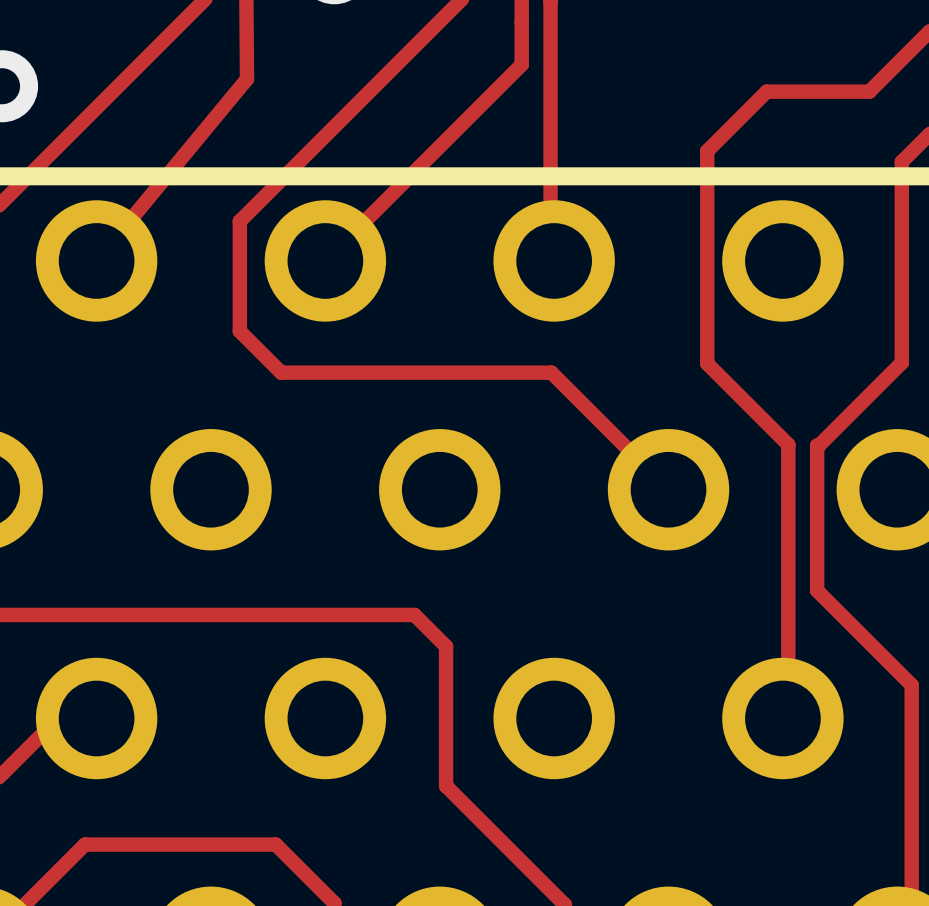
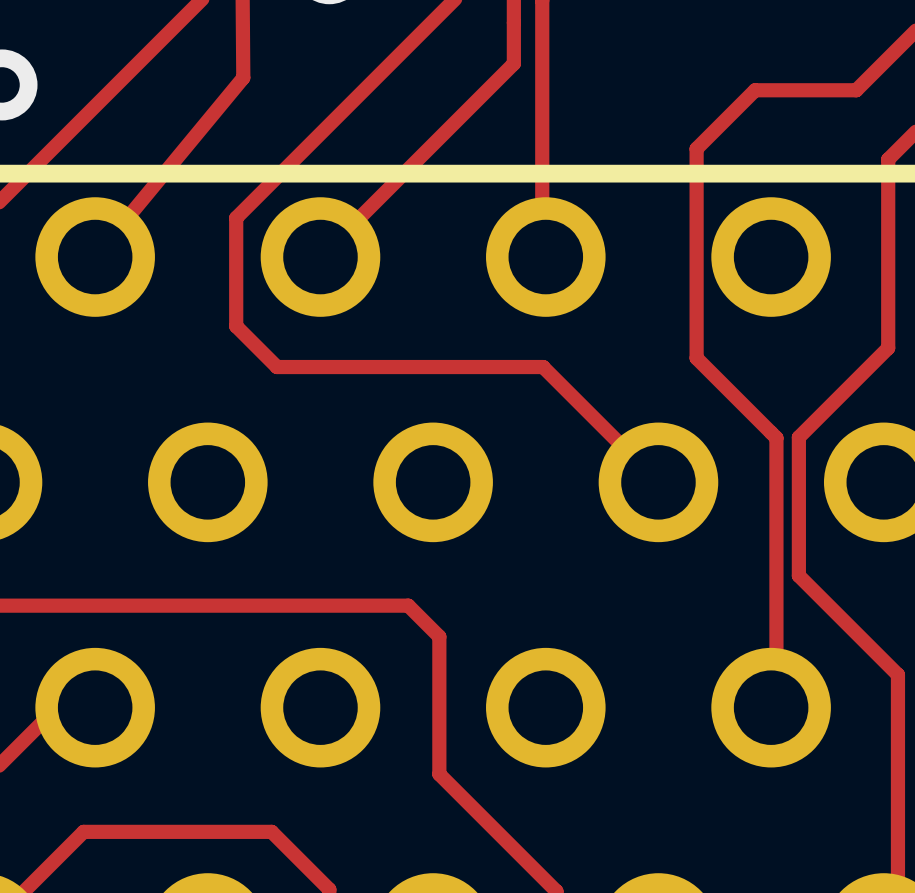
track: (901, 353) (901, 362) (818, 445) -> none
track: (817, 445) (817, 590) -> (888, 348) (798, 437) (798, 575) (804, 581)

